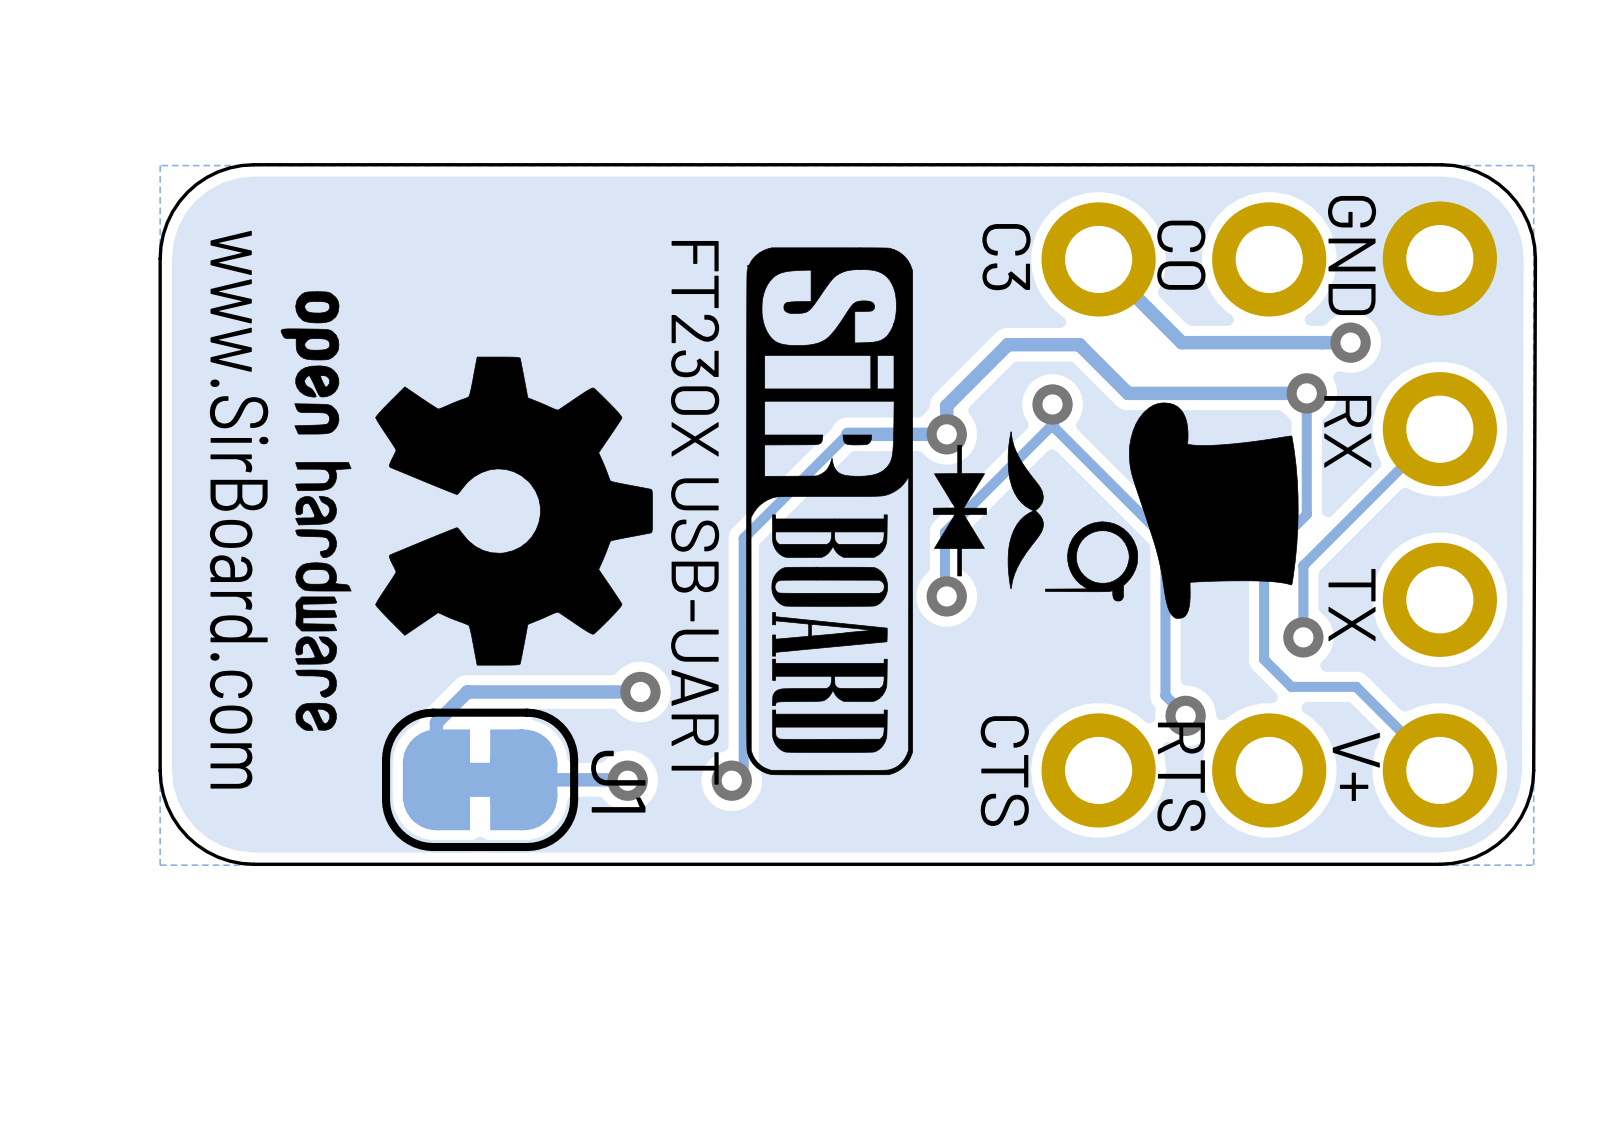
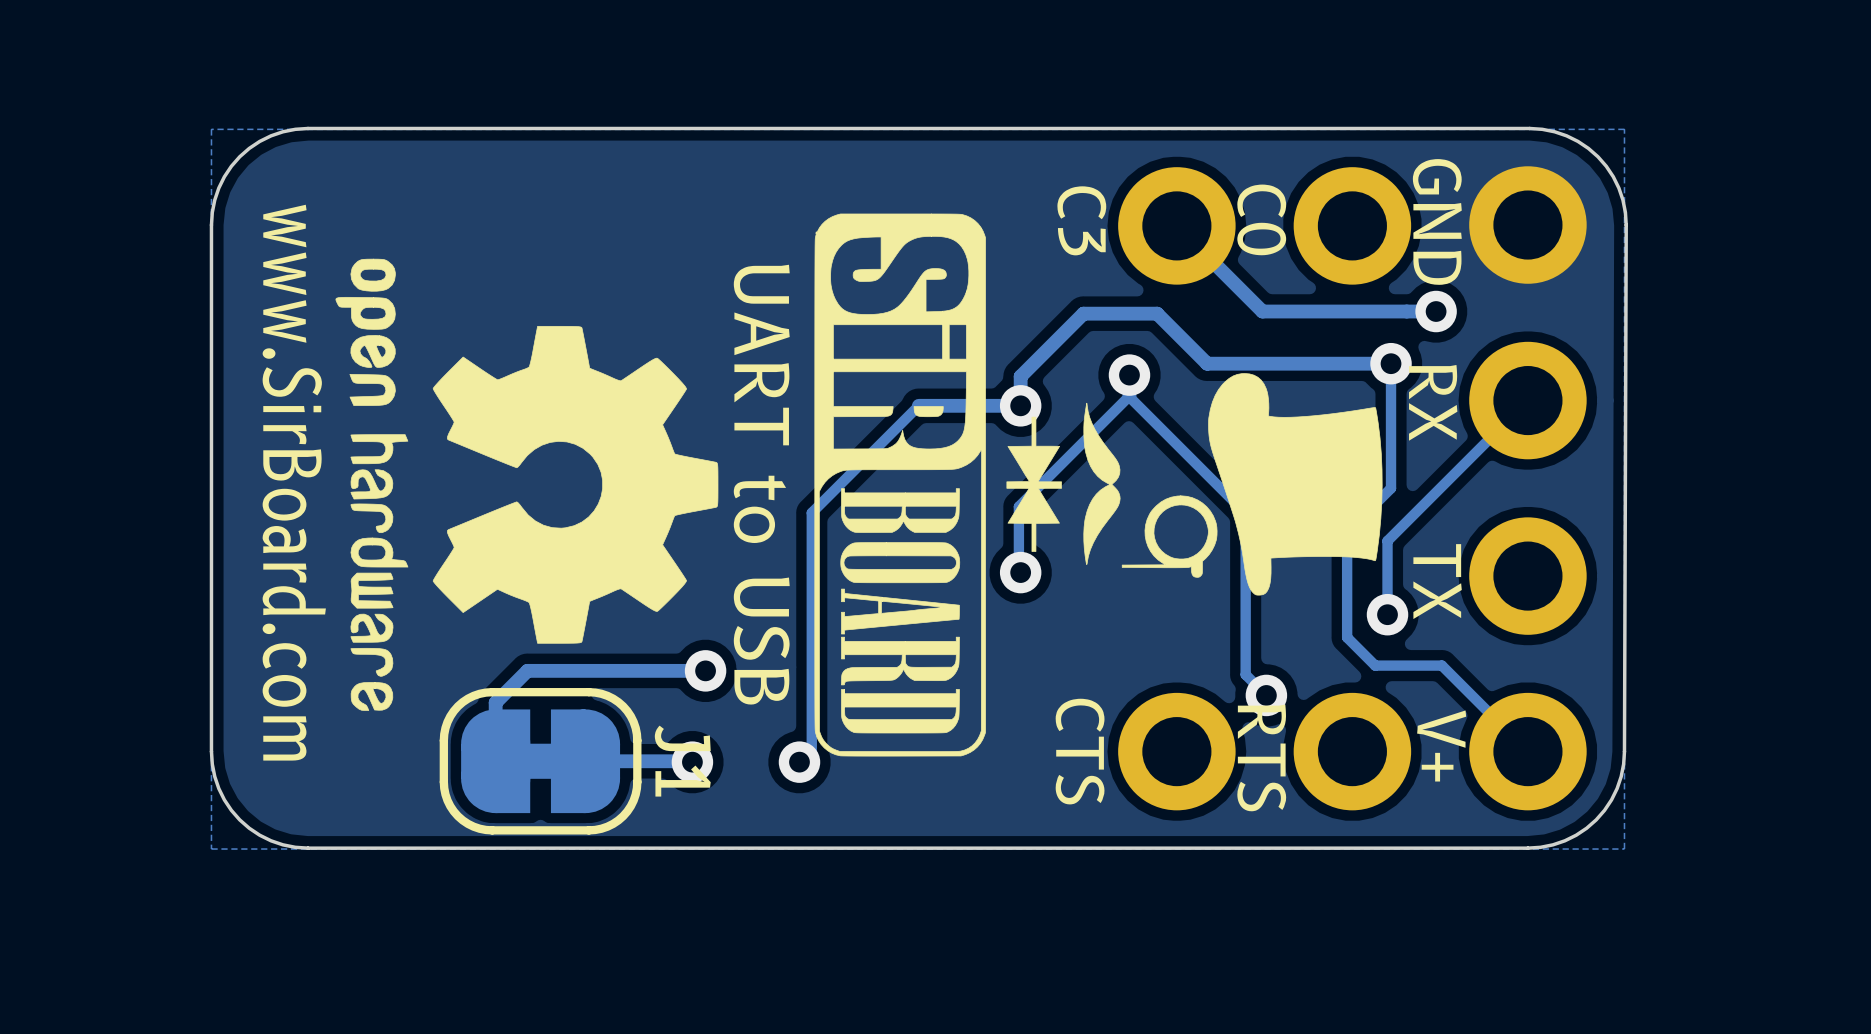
text: FT230X USB-UART (695, 512) -> UART to USB (761, 484)

